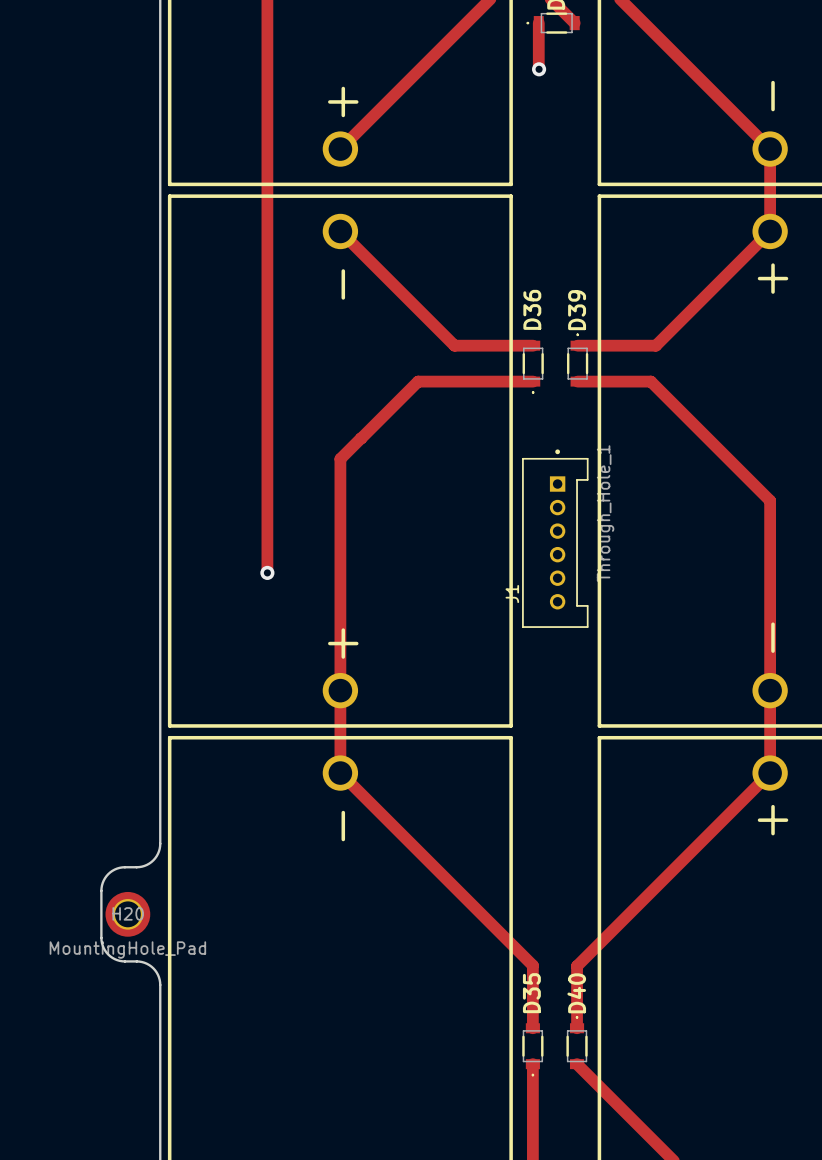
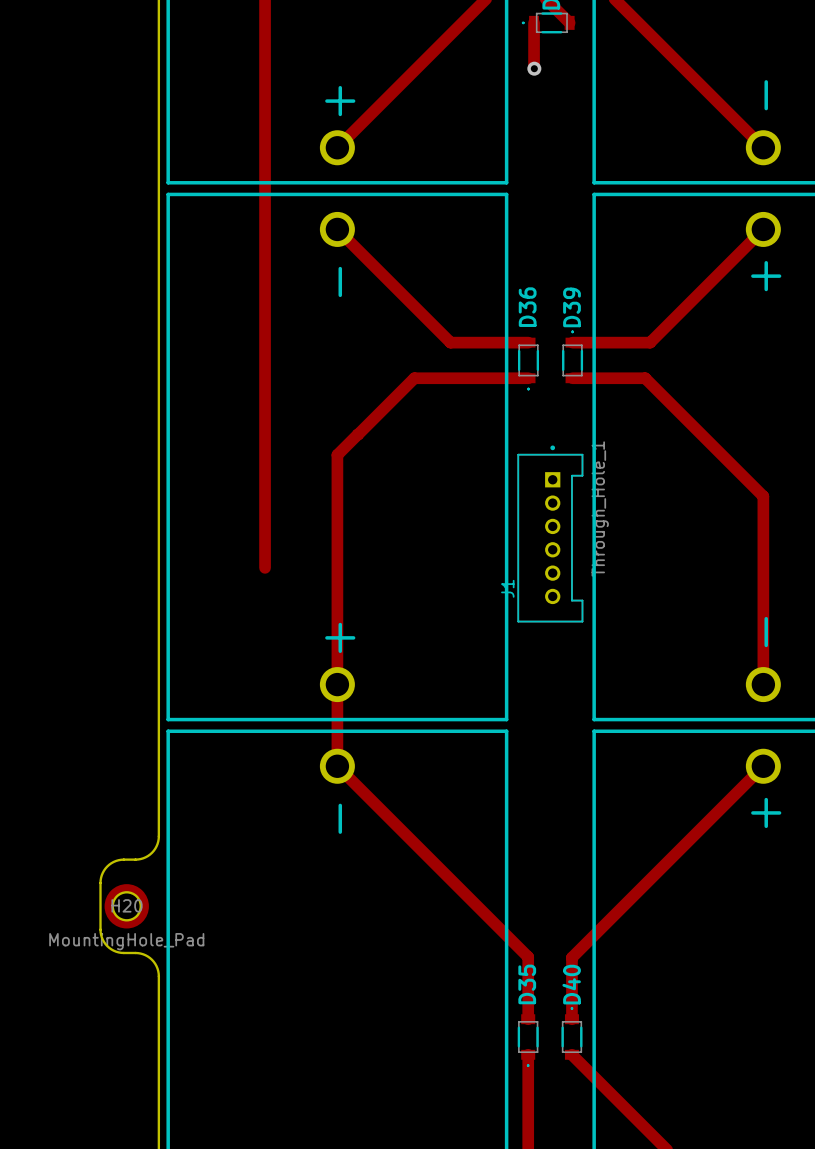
track: (770, 149) (770, 231) -> none
via: (267, 572) -> none
track: (770, 690) (770, 773) -> none

